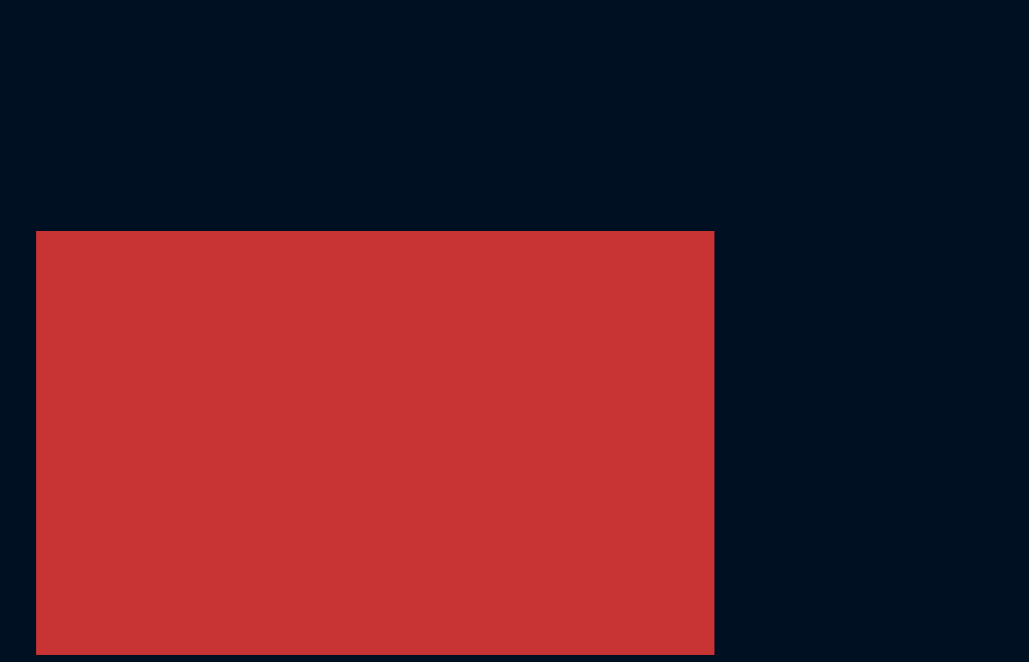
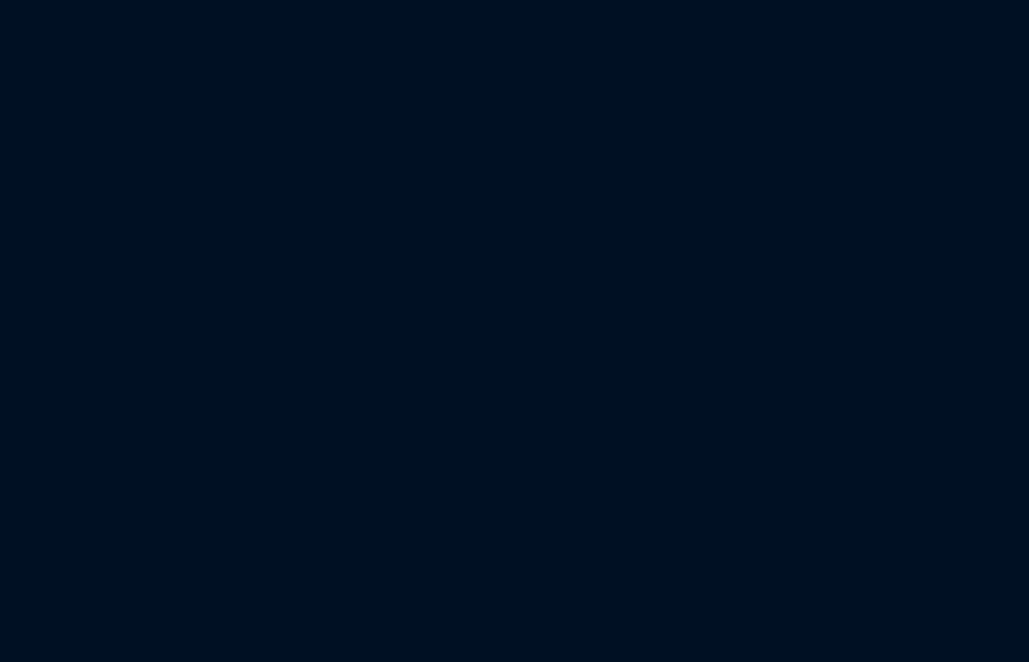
part: (375, 442) -> none

